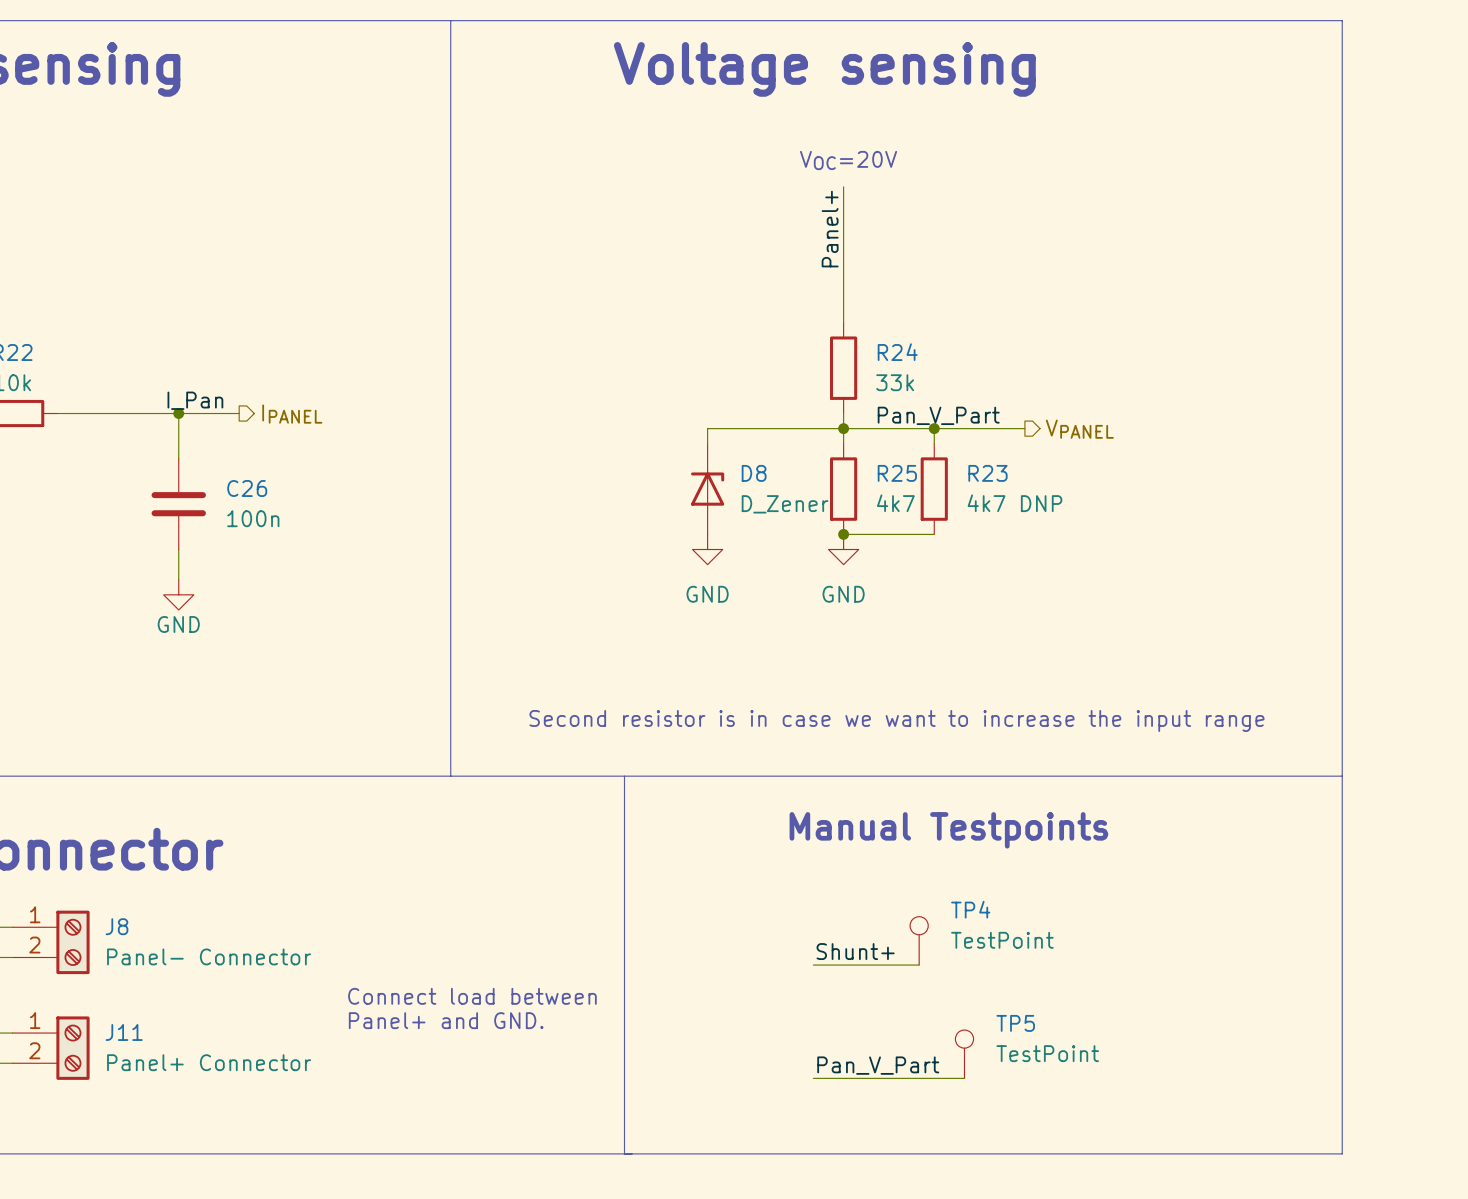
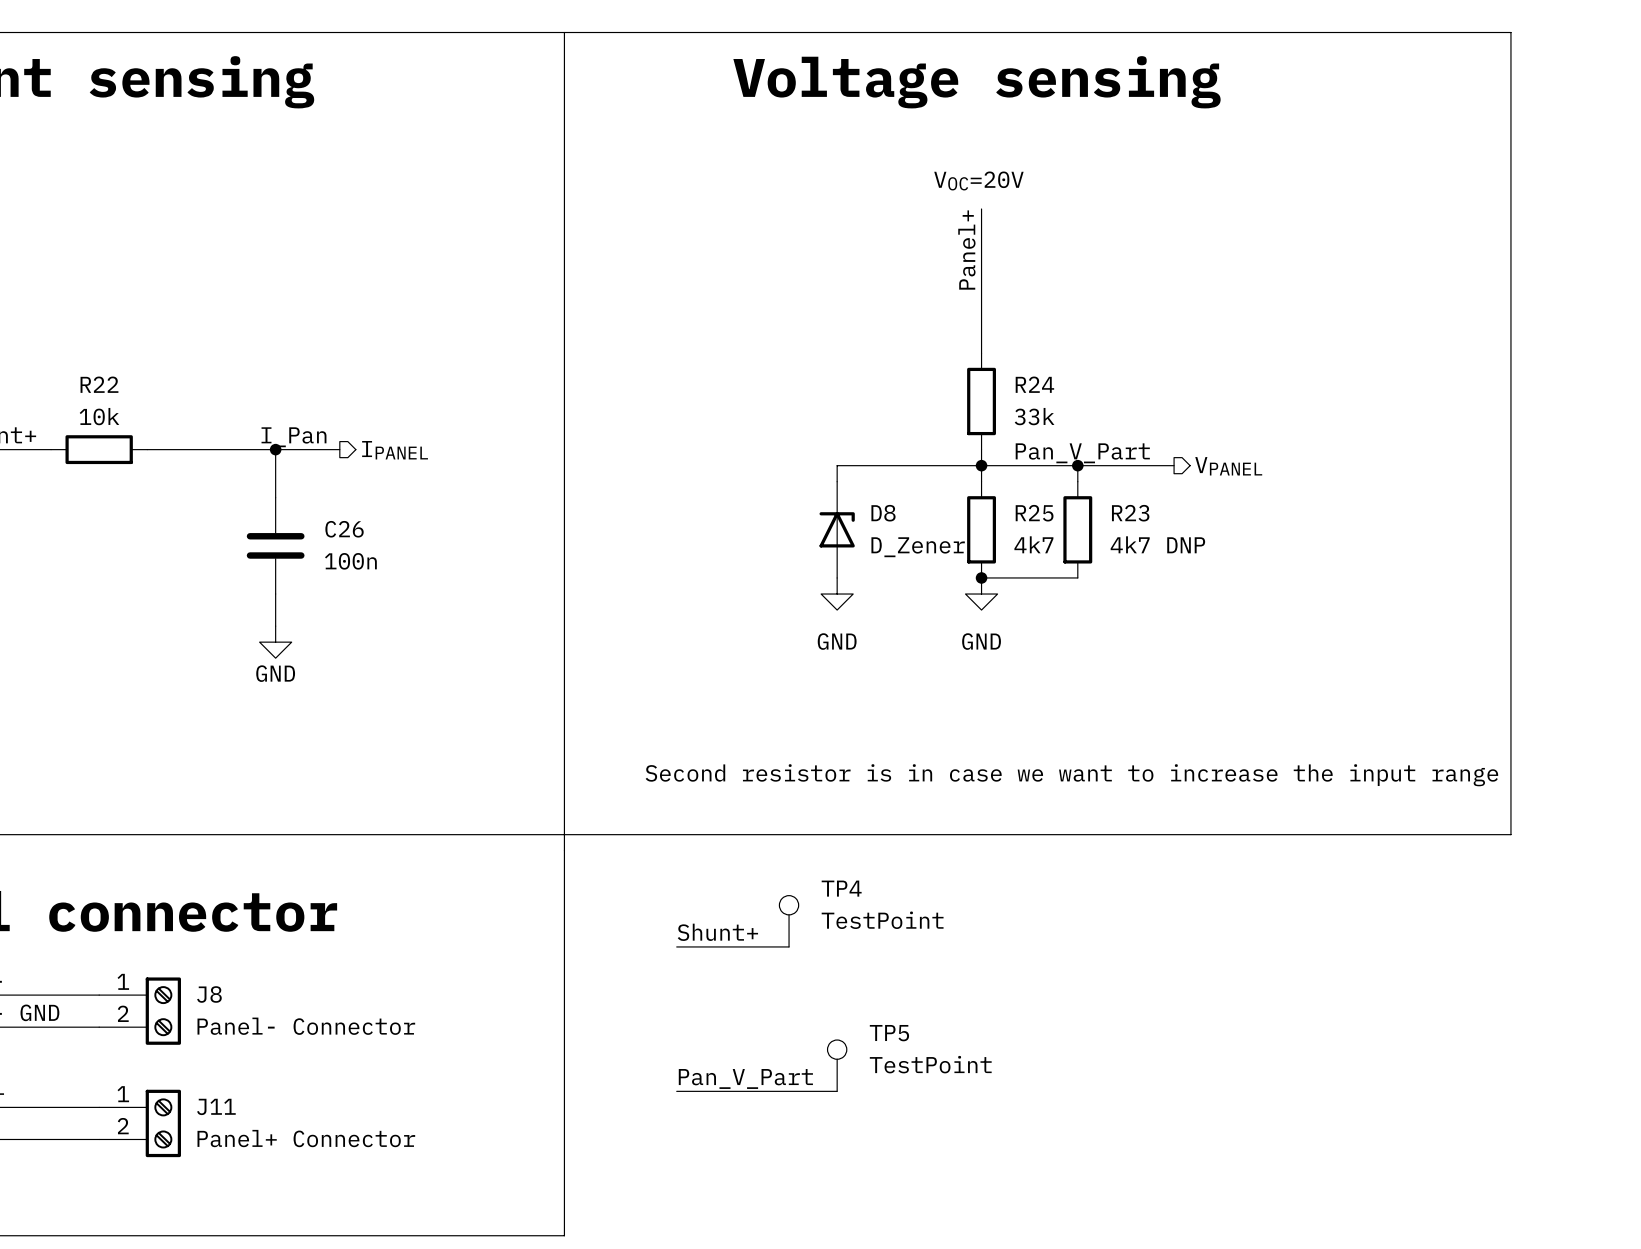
line: (624, 776) (624, 1153) -> none
line: (1342, 776) (1342, 1153) (450, 1153) -> (564, 834) (564, 1235)
text: Manual Testpoints (948, 830) -> none
TP4 position: (919, 940) -> (789, 921)
label position: Shunt+ (855, 951) -> Shunt+ (717, 932)
wire: (813, 965) (919, 965) -> (676, 946) (789, 946)
text: Connect load between (472, 996) -> none
text: Panel+ and GND. (446, 1020) -> none
TP5 position: (964, 1054) -> (837, 1065)
label position: Pan_V_Part (878, 1065) -> Pan_V_Part (745, 1078)
wire: (813, 1078) (964, 1078) -> (676, 1091) (837, 1091)

